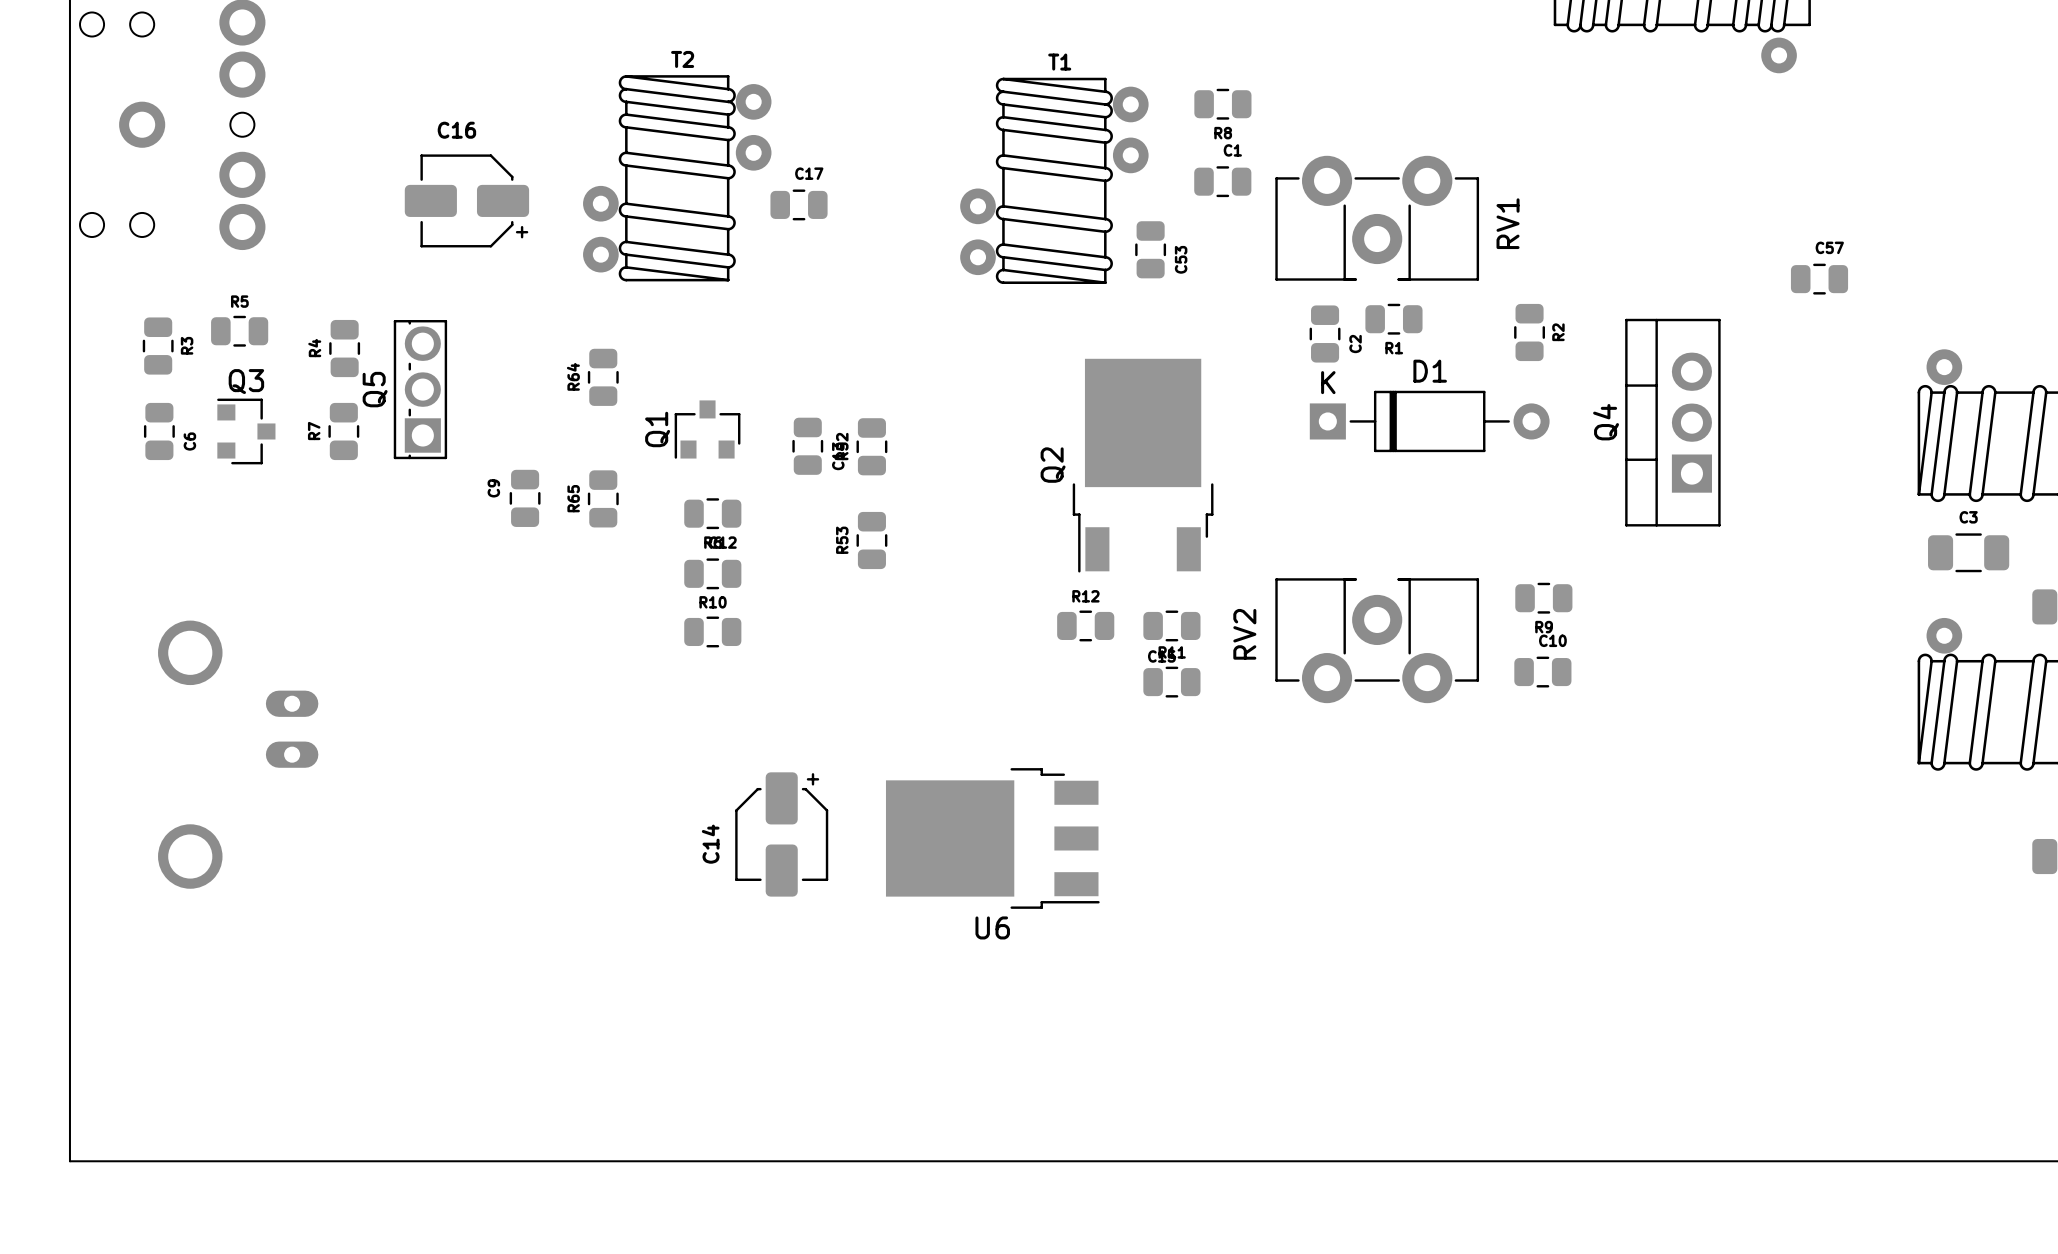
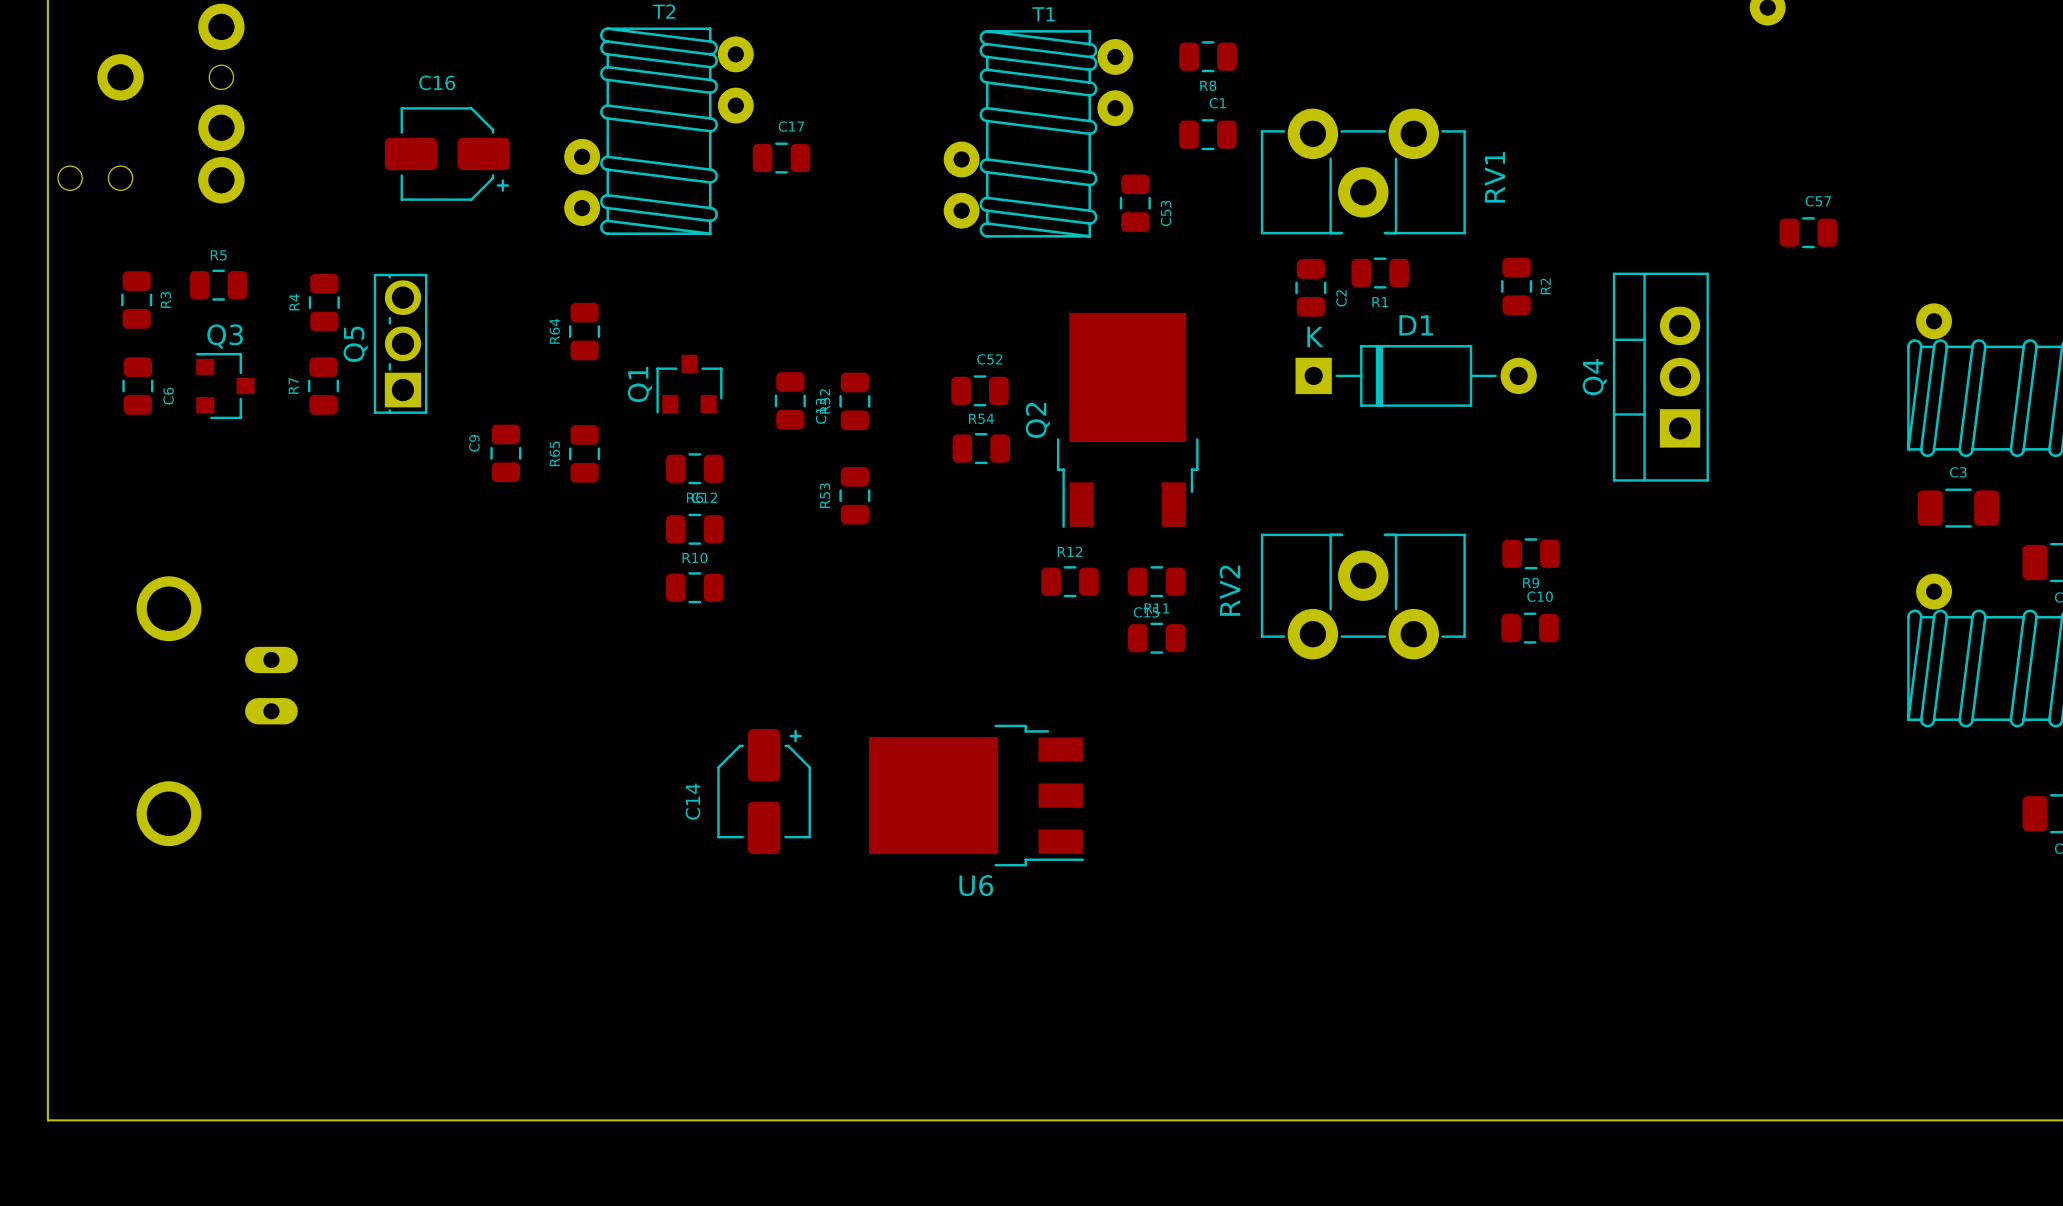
C52: none -> (979, 390)
R54: none -> (981, 448)

